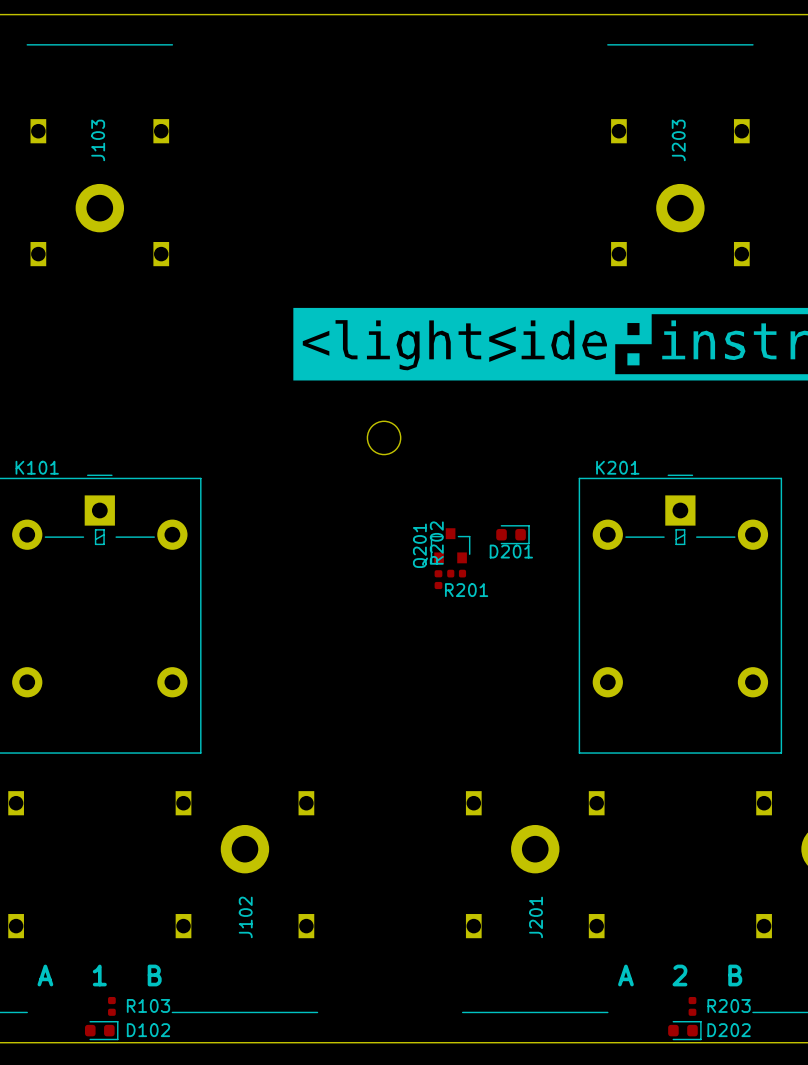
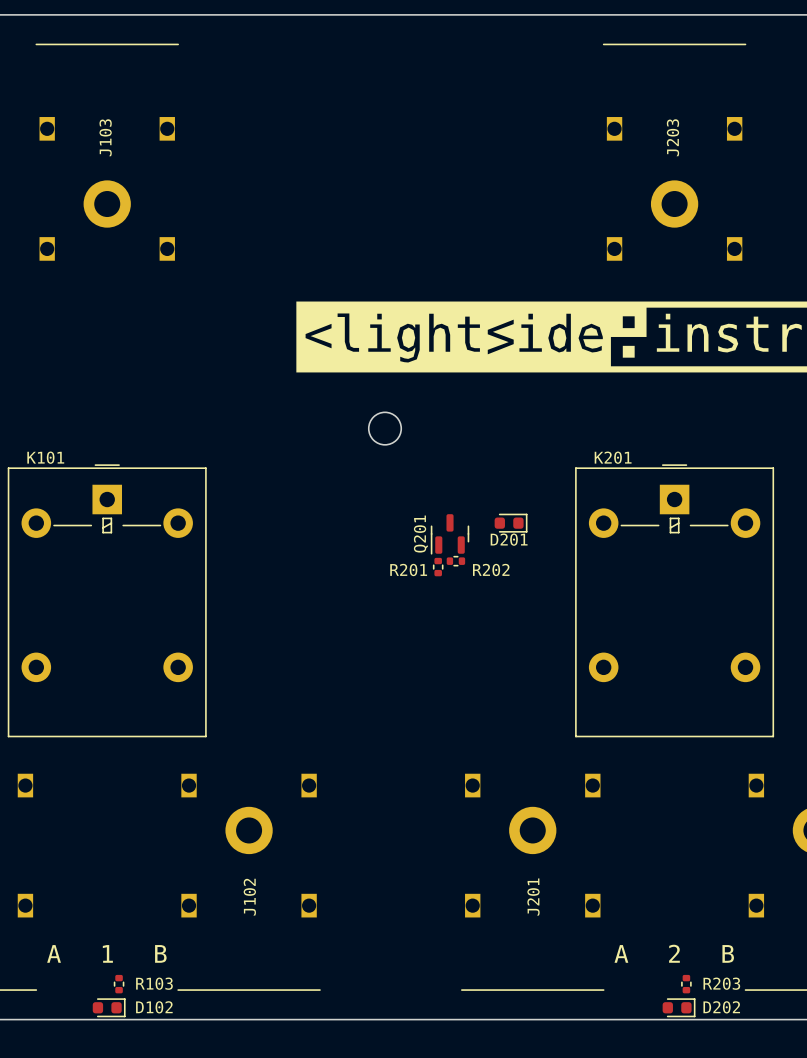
Q201 footprint: [430, 528, 471, 564] -> [430, 514, 470, 555]
R202 name position: R202 (436, 543) -> R202 (491, 570)
R201 footprint: [447, 569, 467, 578] -> [446, 555, 466, 567]
R202 footprint: [434, 570, 443, 590] -> [432, 557, 444, 577]
R201 name position: R201 (466, 590) -> R201 (408, 570)
R103 footprint: [108, 996, 116, 1016] -> [113, 974, 125, 994]
R203 footprint: [688, 996, 697, 1016] -> [681, 974, 692, 994]

